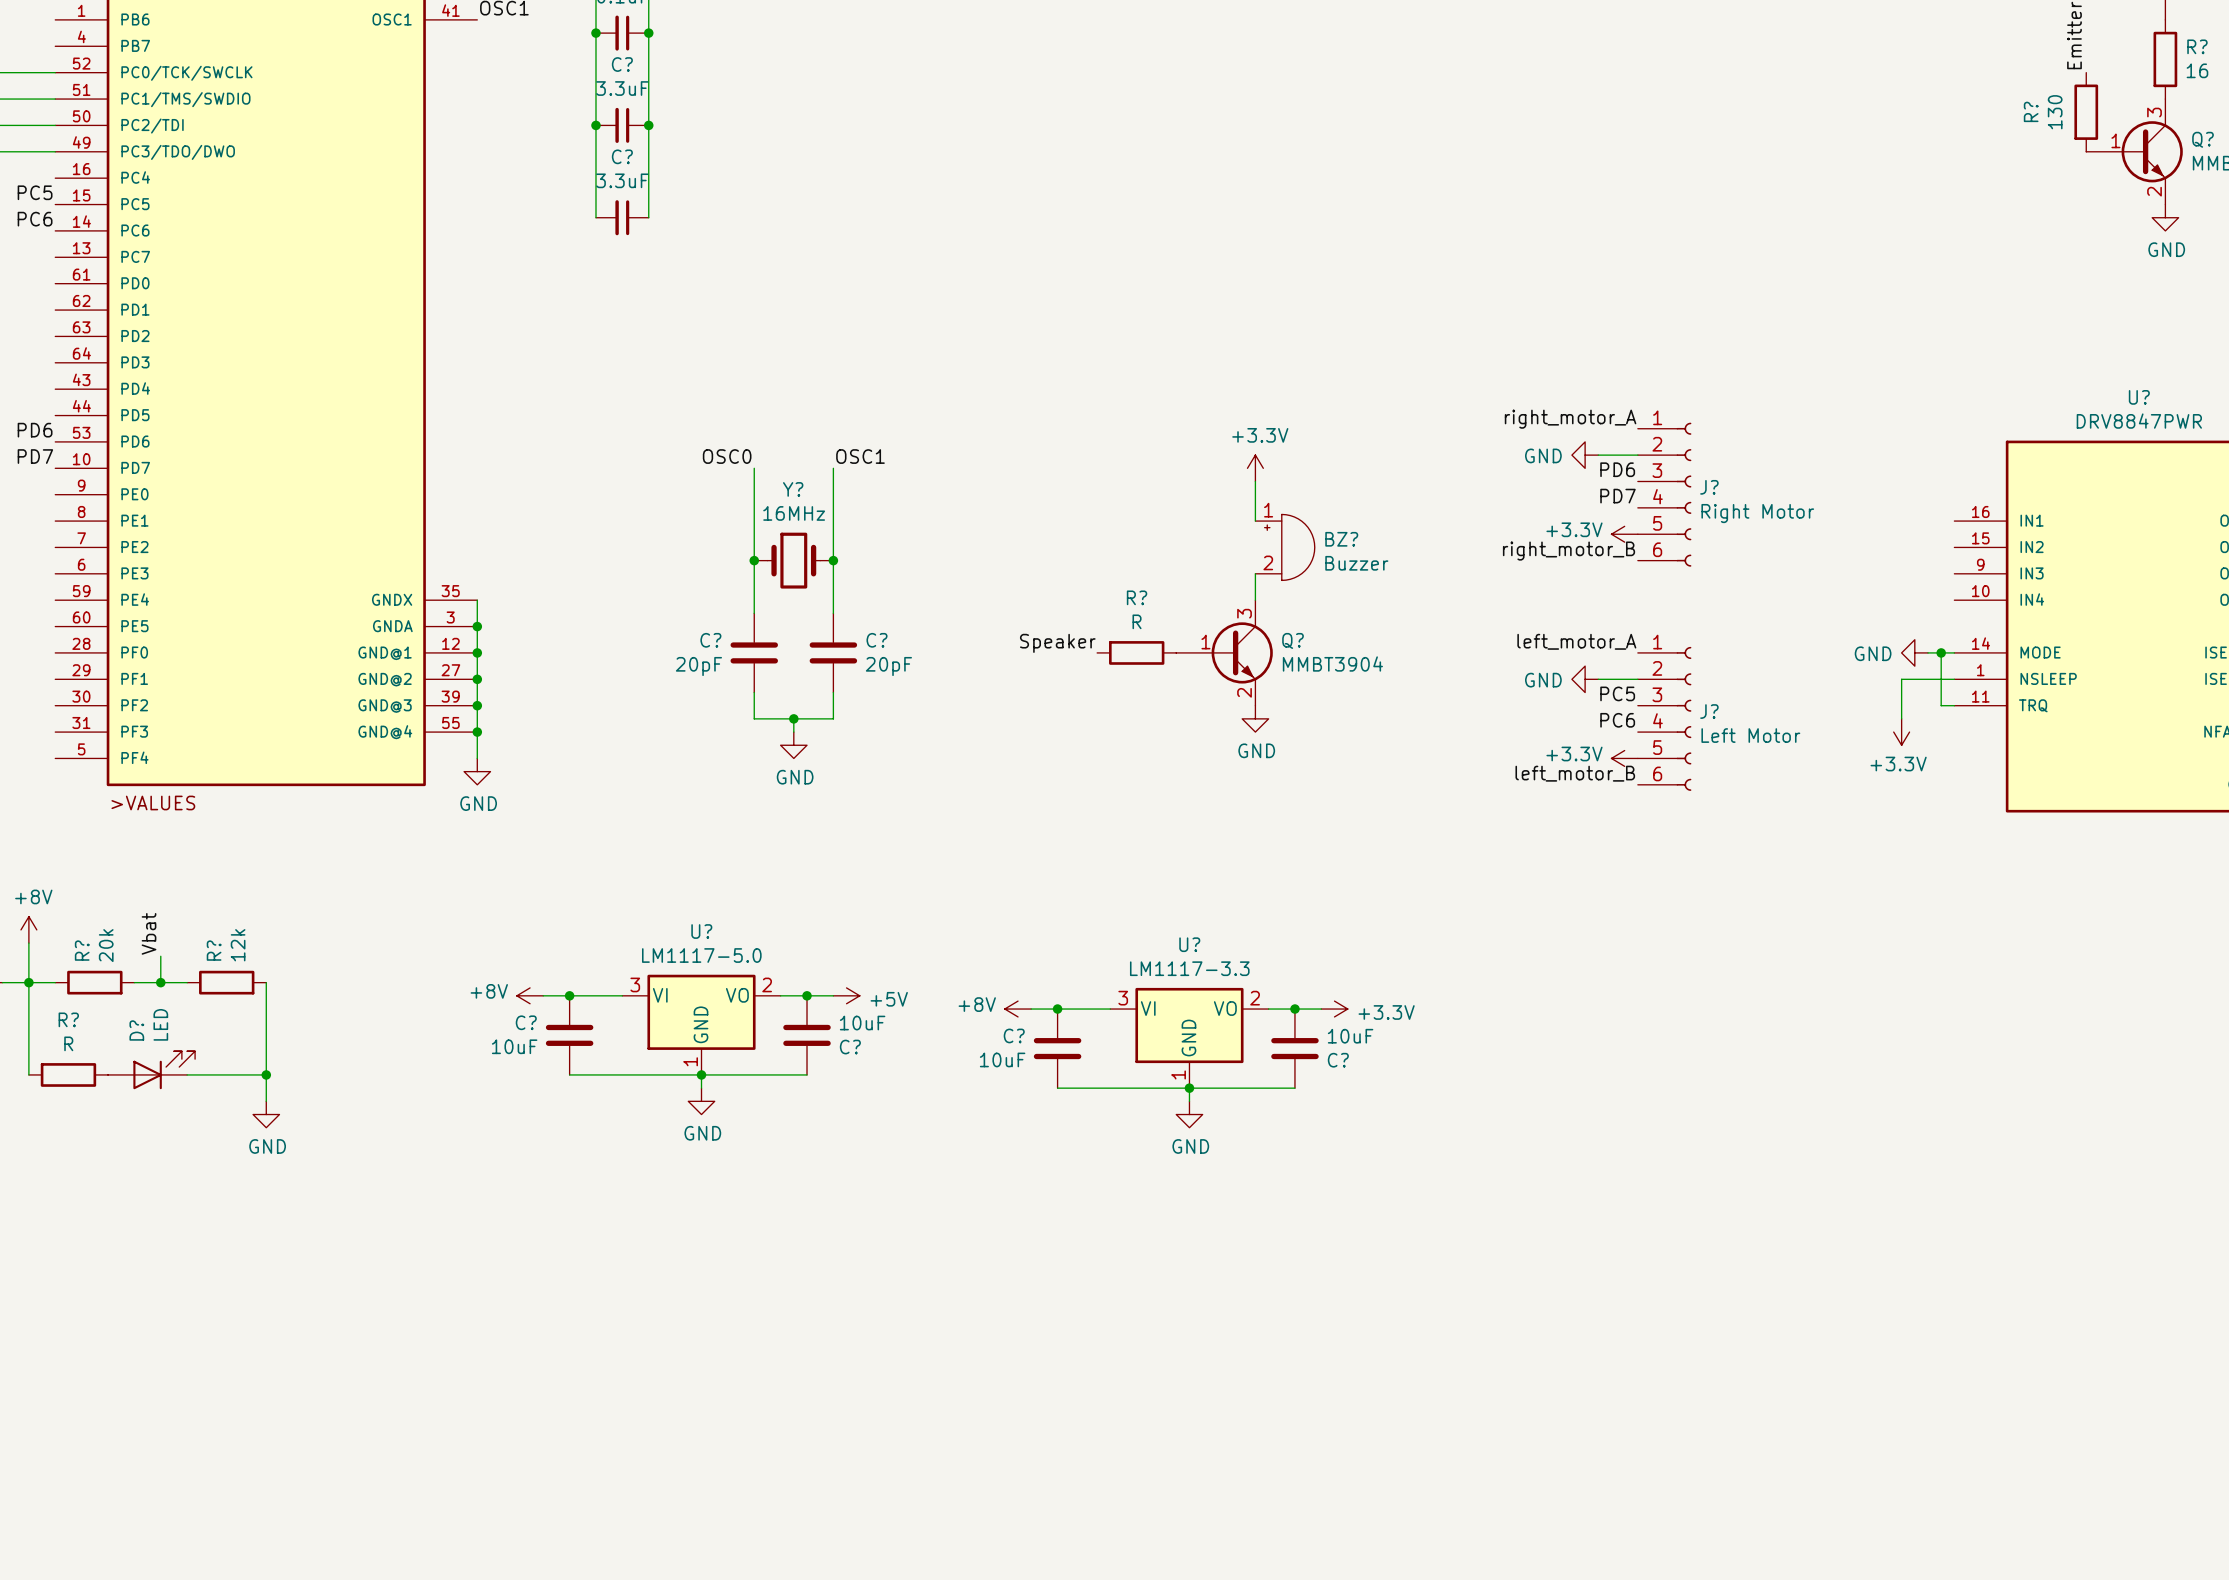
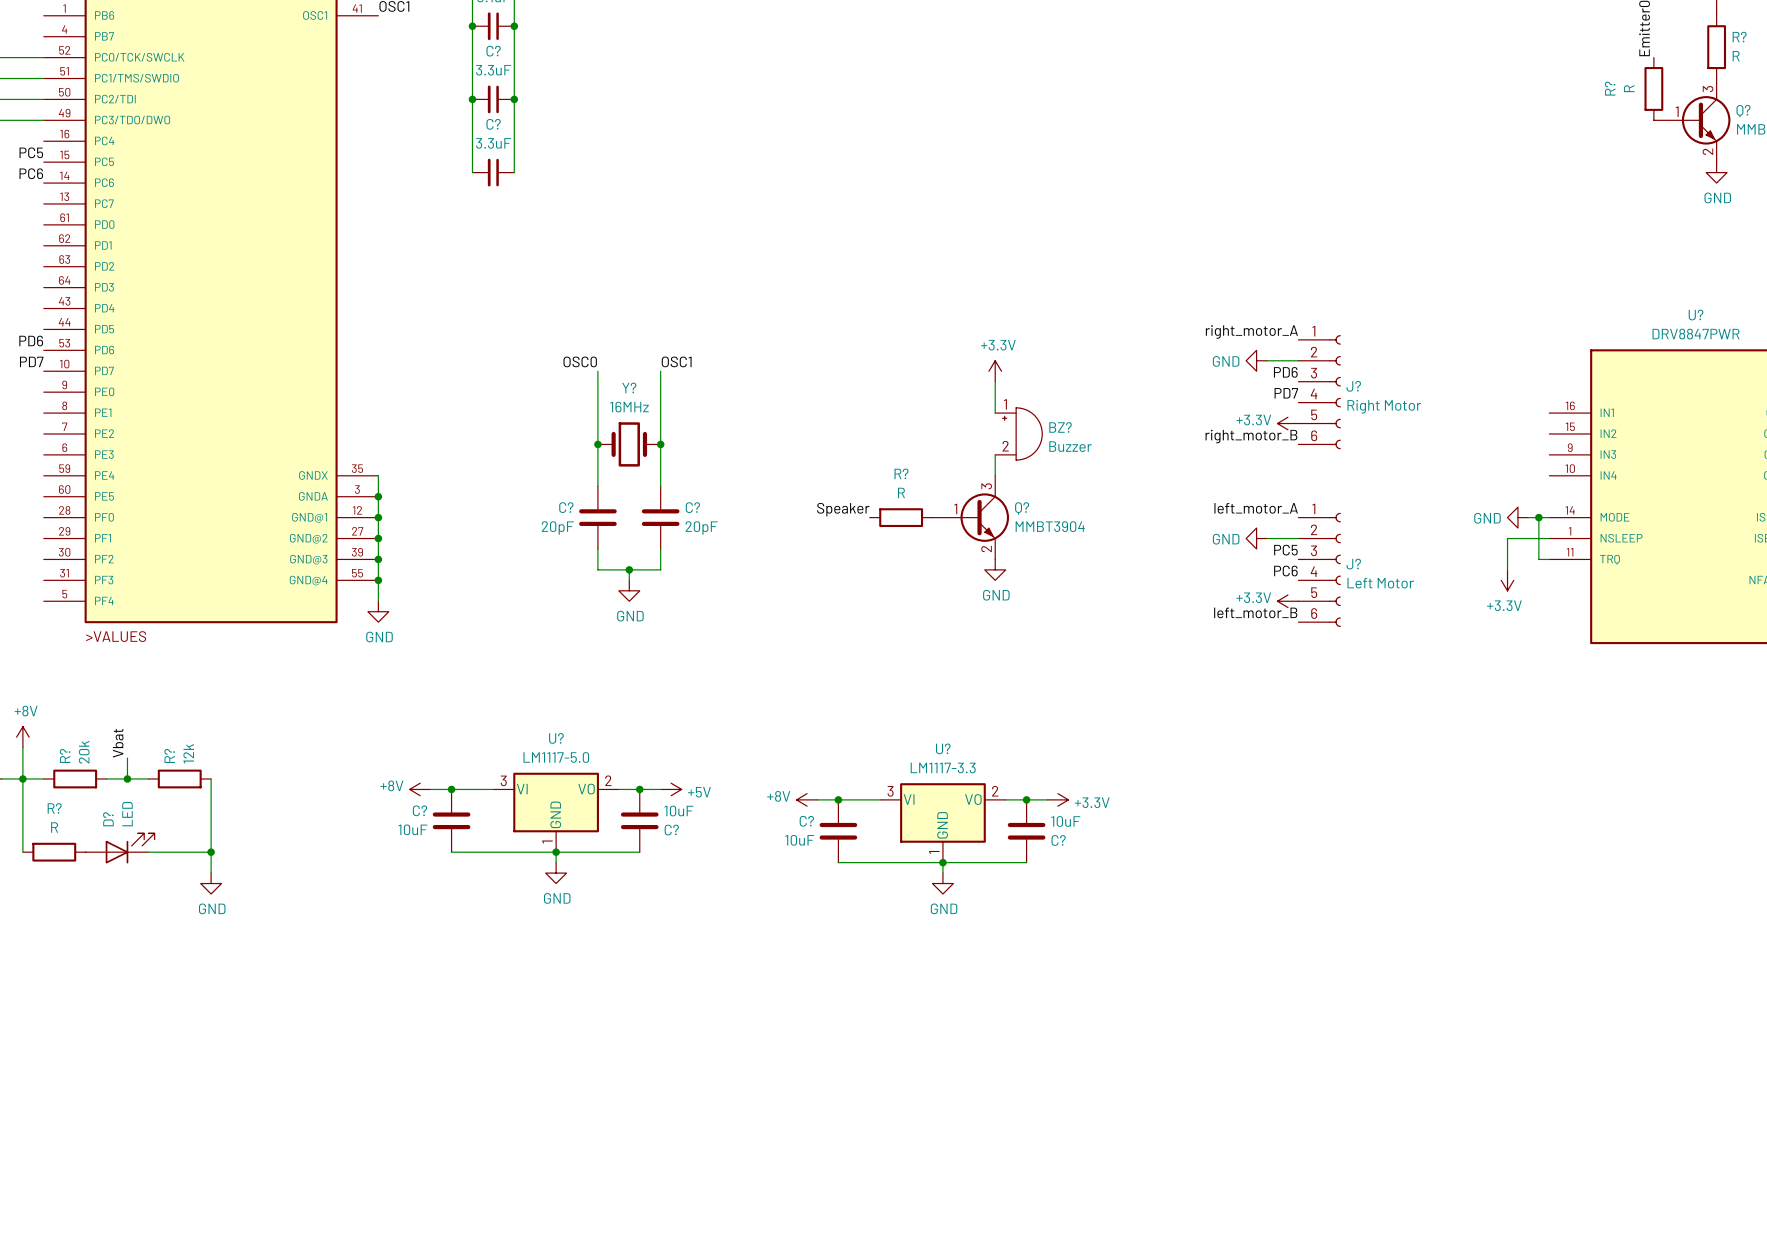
R? value: 16 (2197, 70) -> R (1736, 56)
R? value: 130 (2055, 112) -> R (1629, 88)

